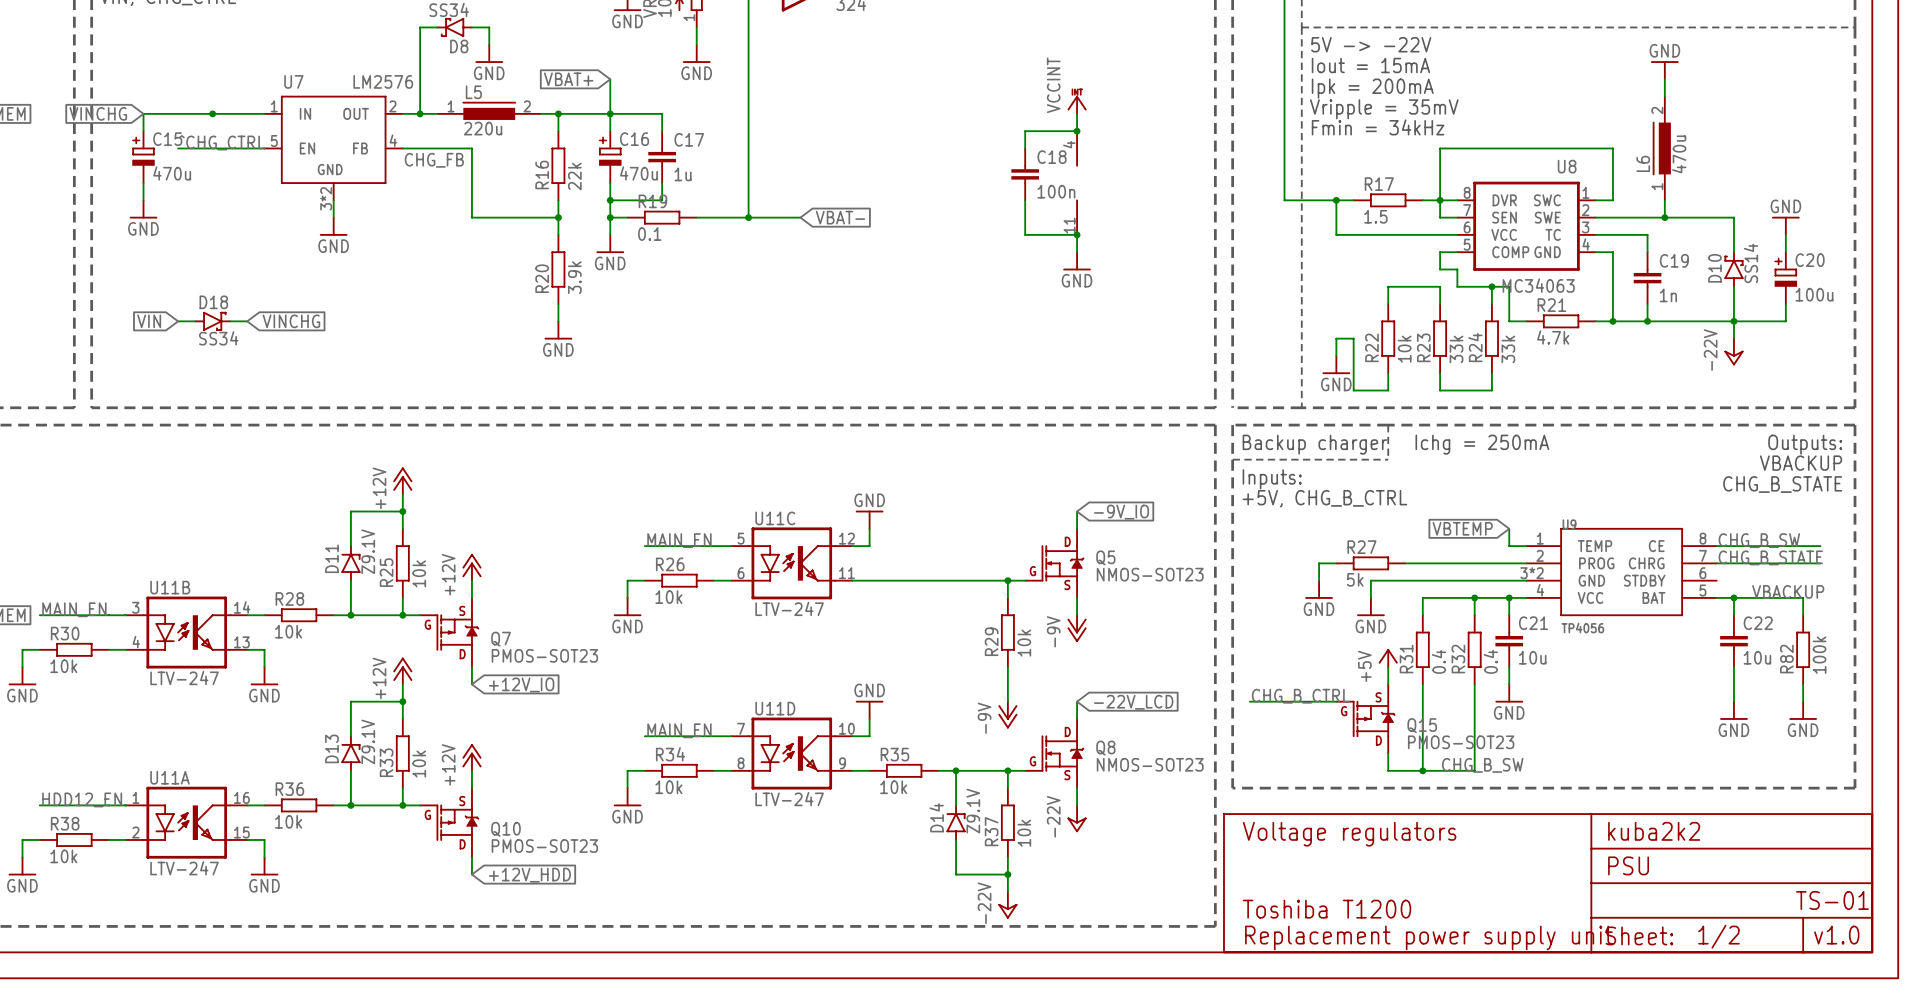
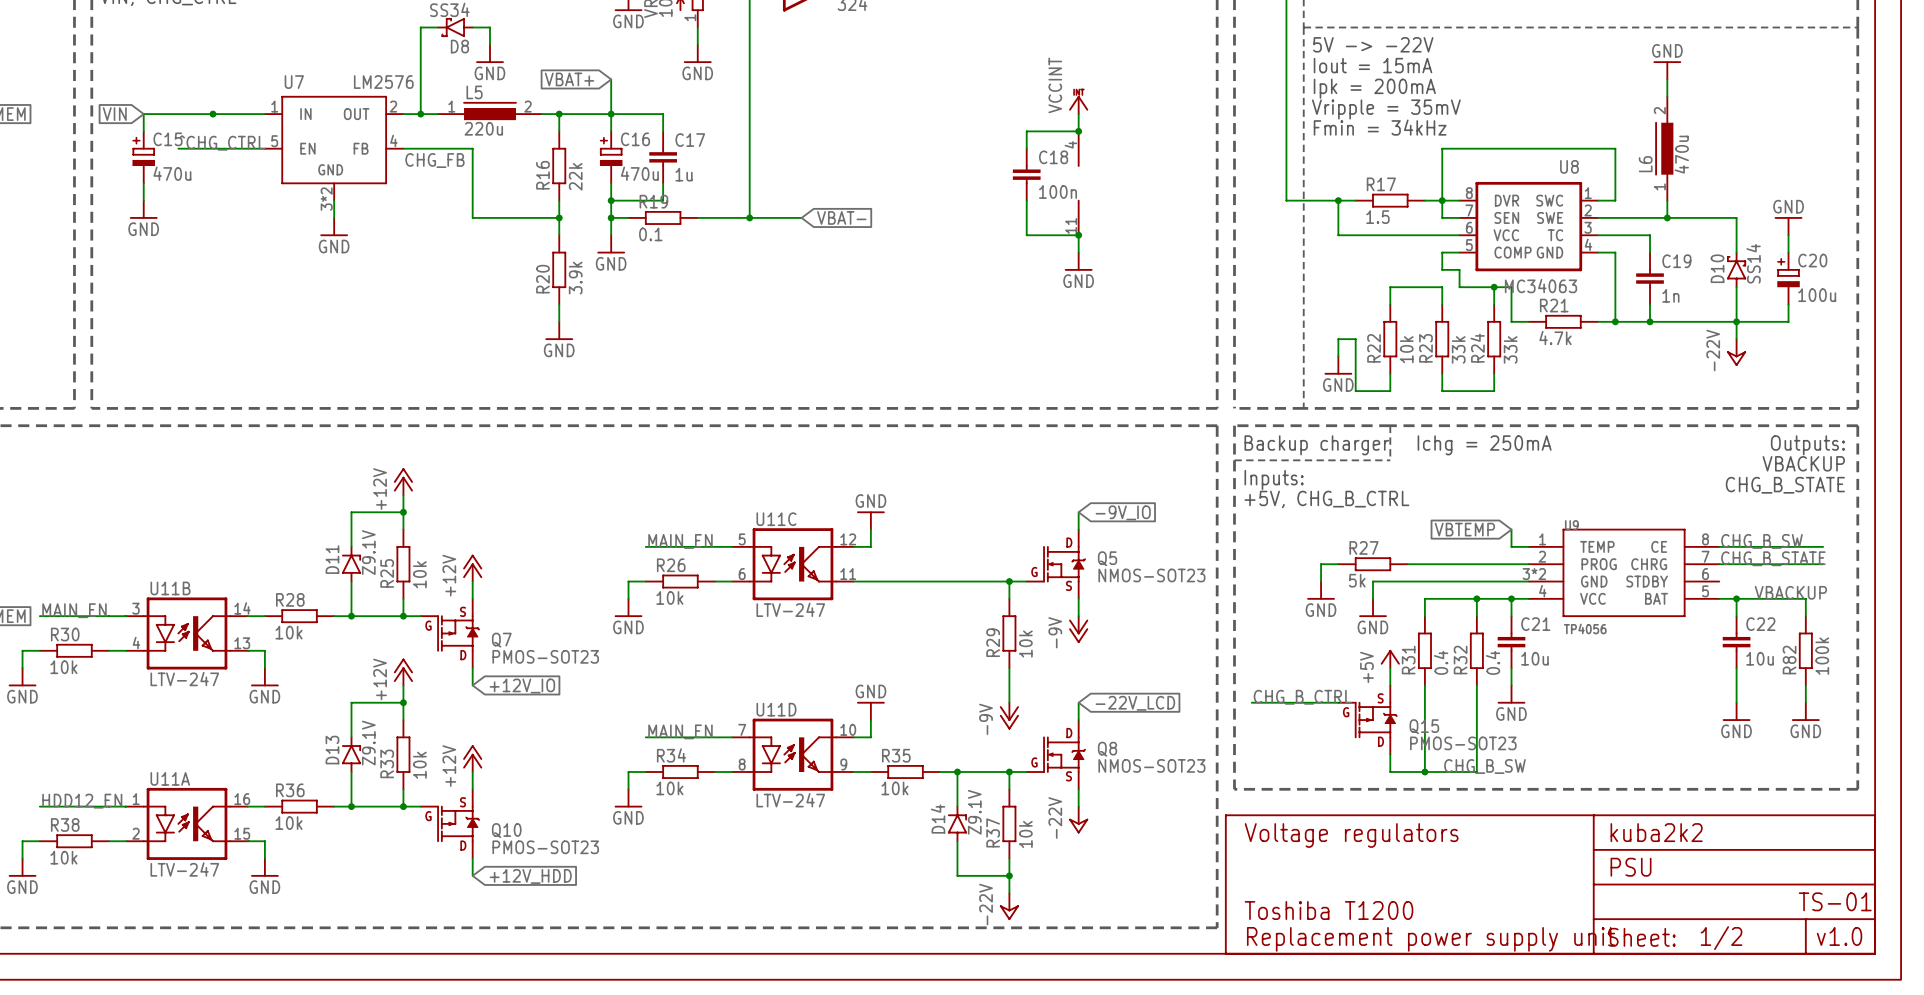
global label: VINCHG (98, 113) -> VIN (114, 114)
global label: VIN (149, 321) -> none
wire: (178, 321) (195, 321) -> none
D18: SS34 (212, 321) -> none
wire: (229, 321) (247, 321) -> none
global label: VINCHG (291, 321) -> none

